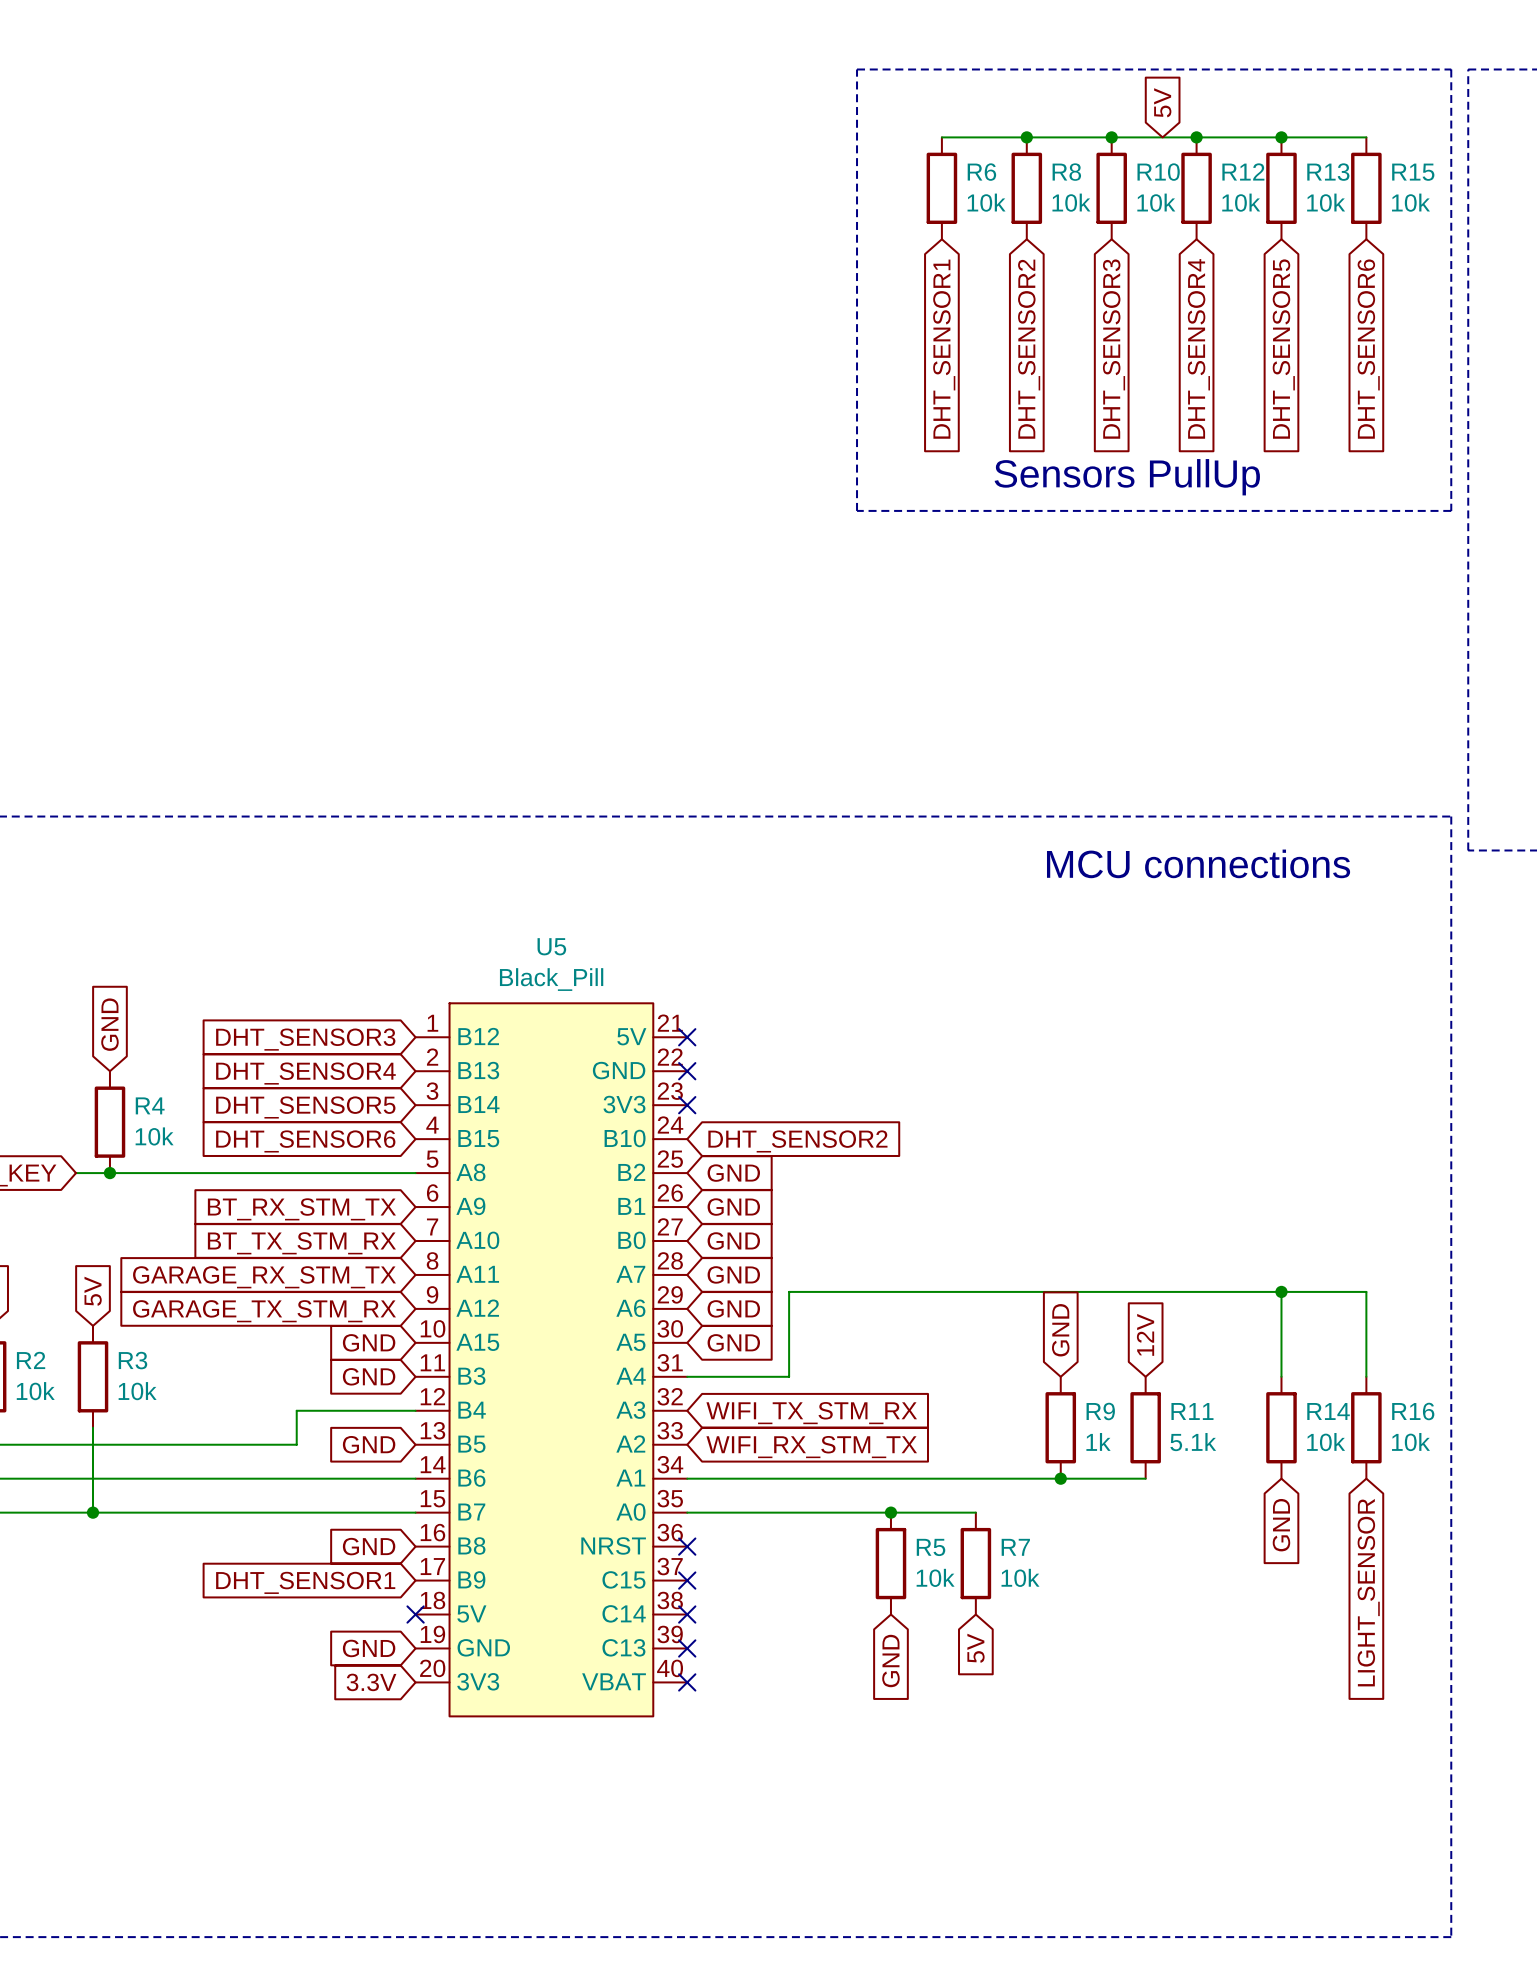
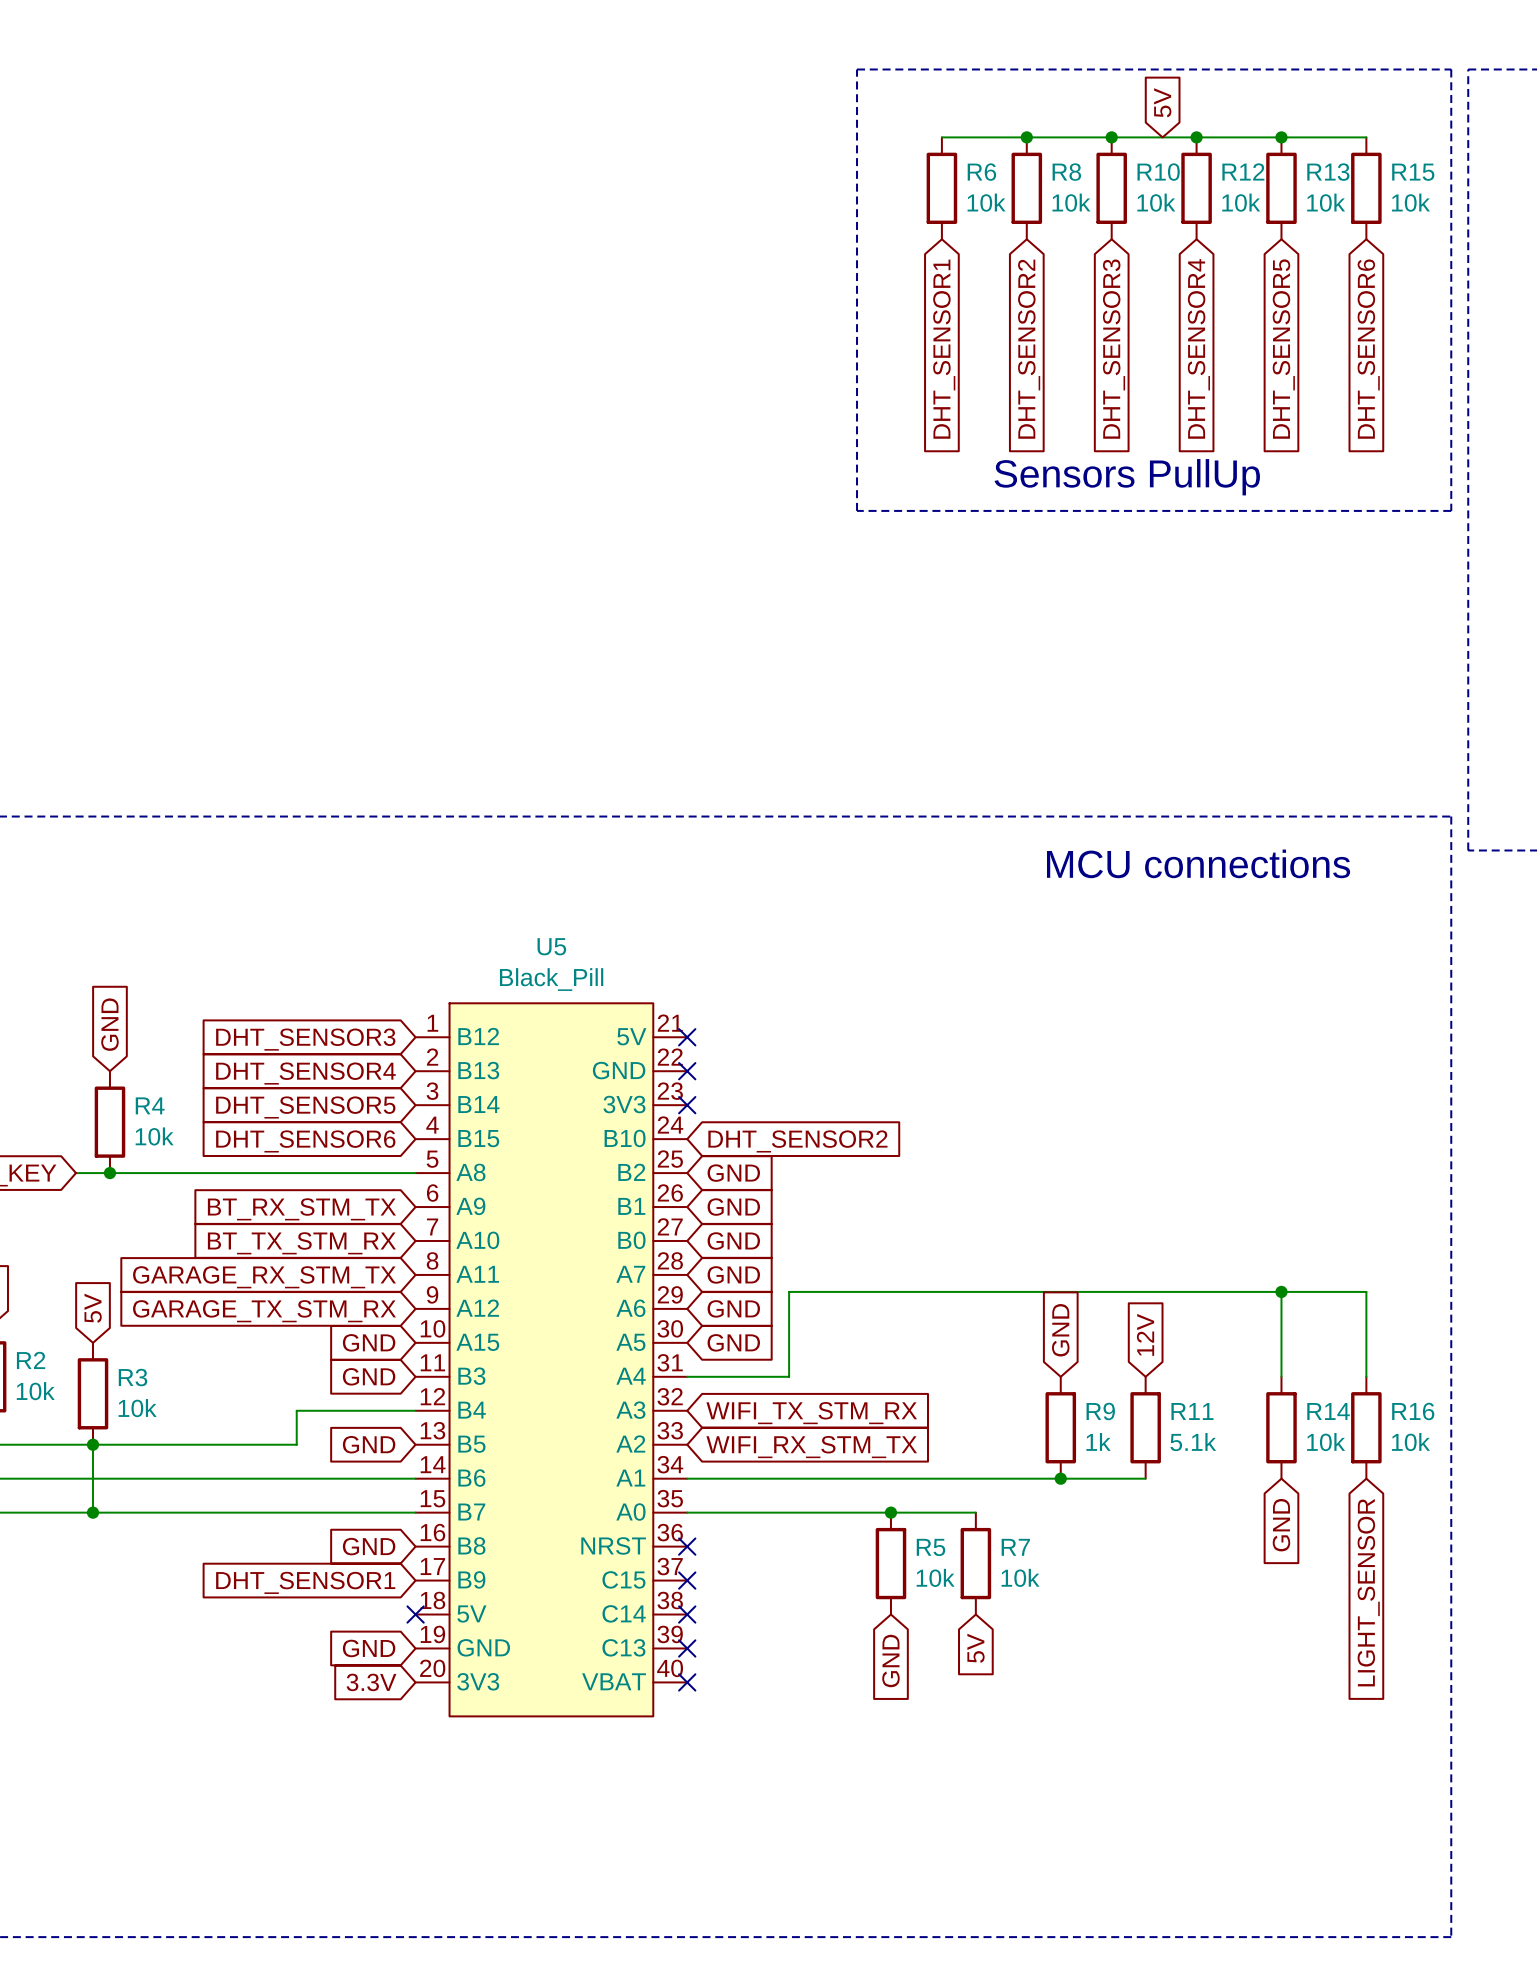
global label position: 5V (93, 1291) -> 5V (93, 1308)
R3 position: (92, 1376) -> (92, 1393)
junction: none -> (92, 1444)

